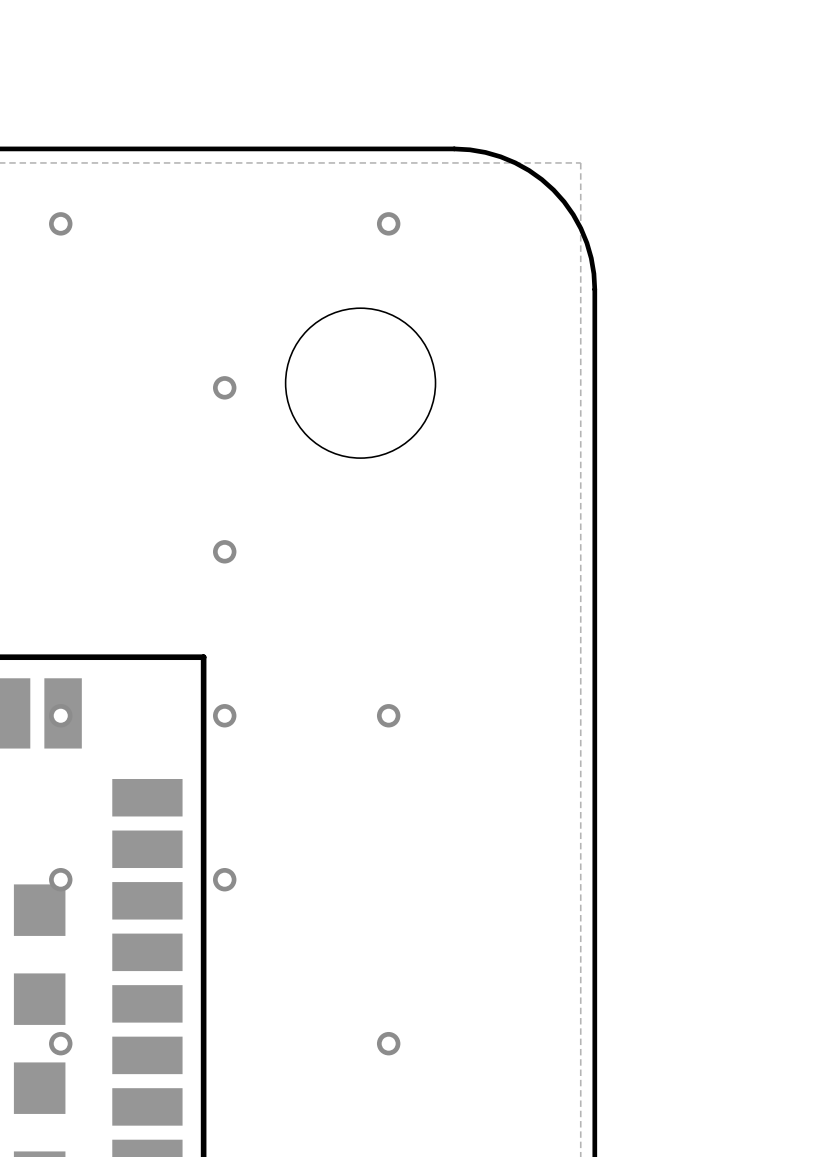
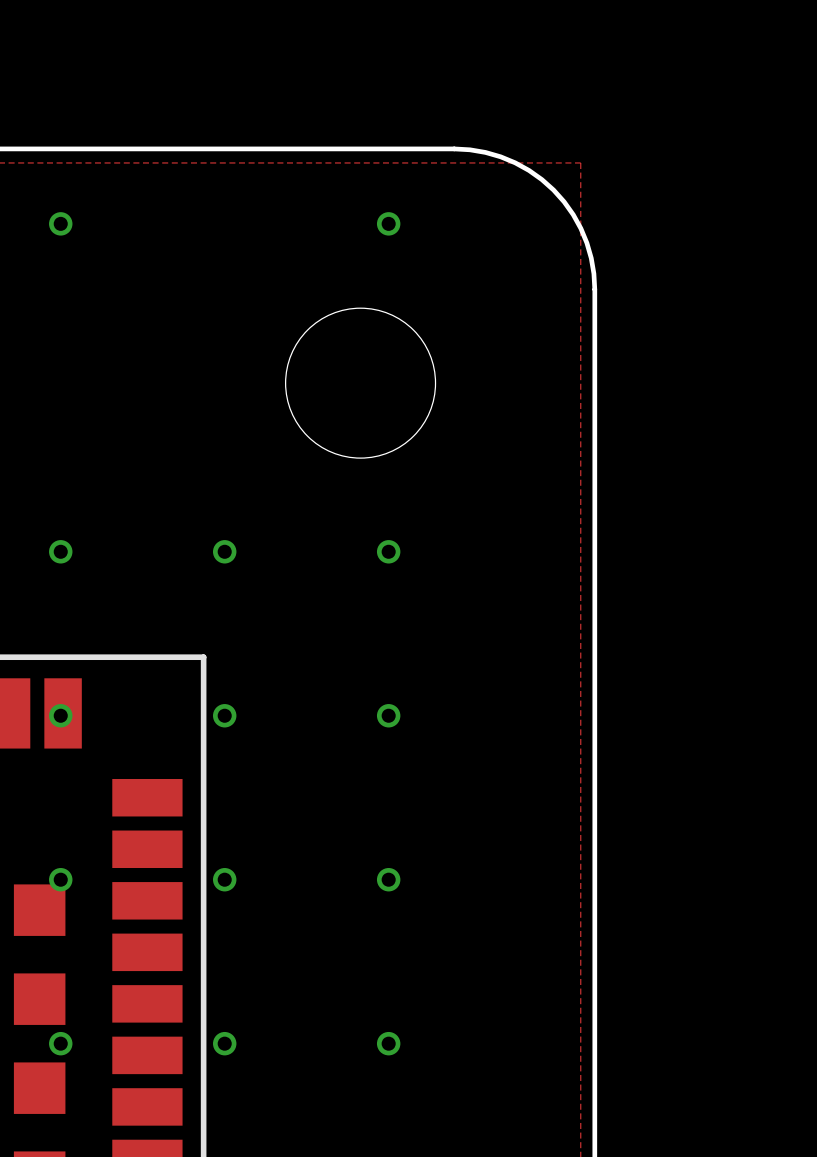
via: (224, 387) -> none
via: none -> (60, 551)
via: none -> (388, 551)
via: none -> (388, 879)
via: none -> (224, 1043)

